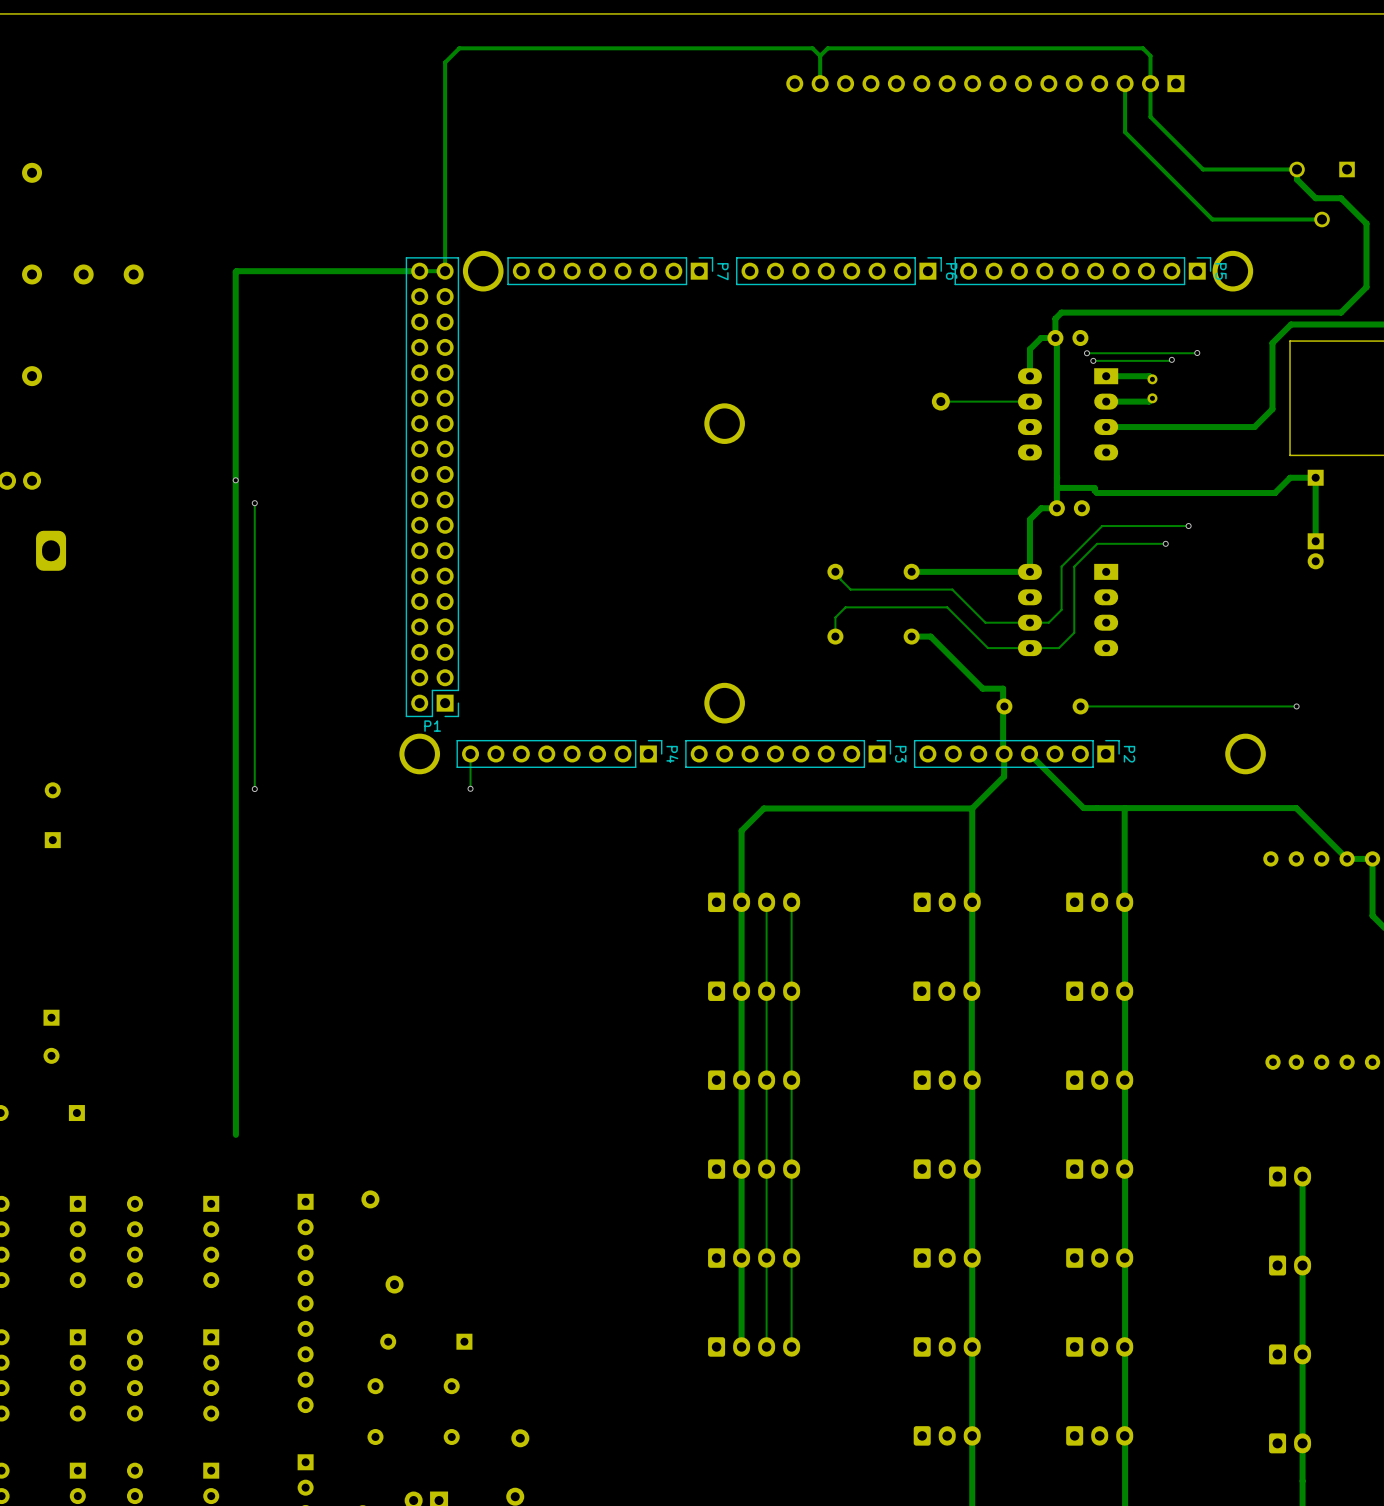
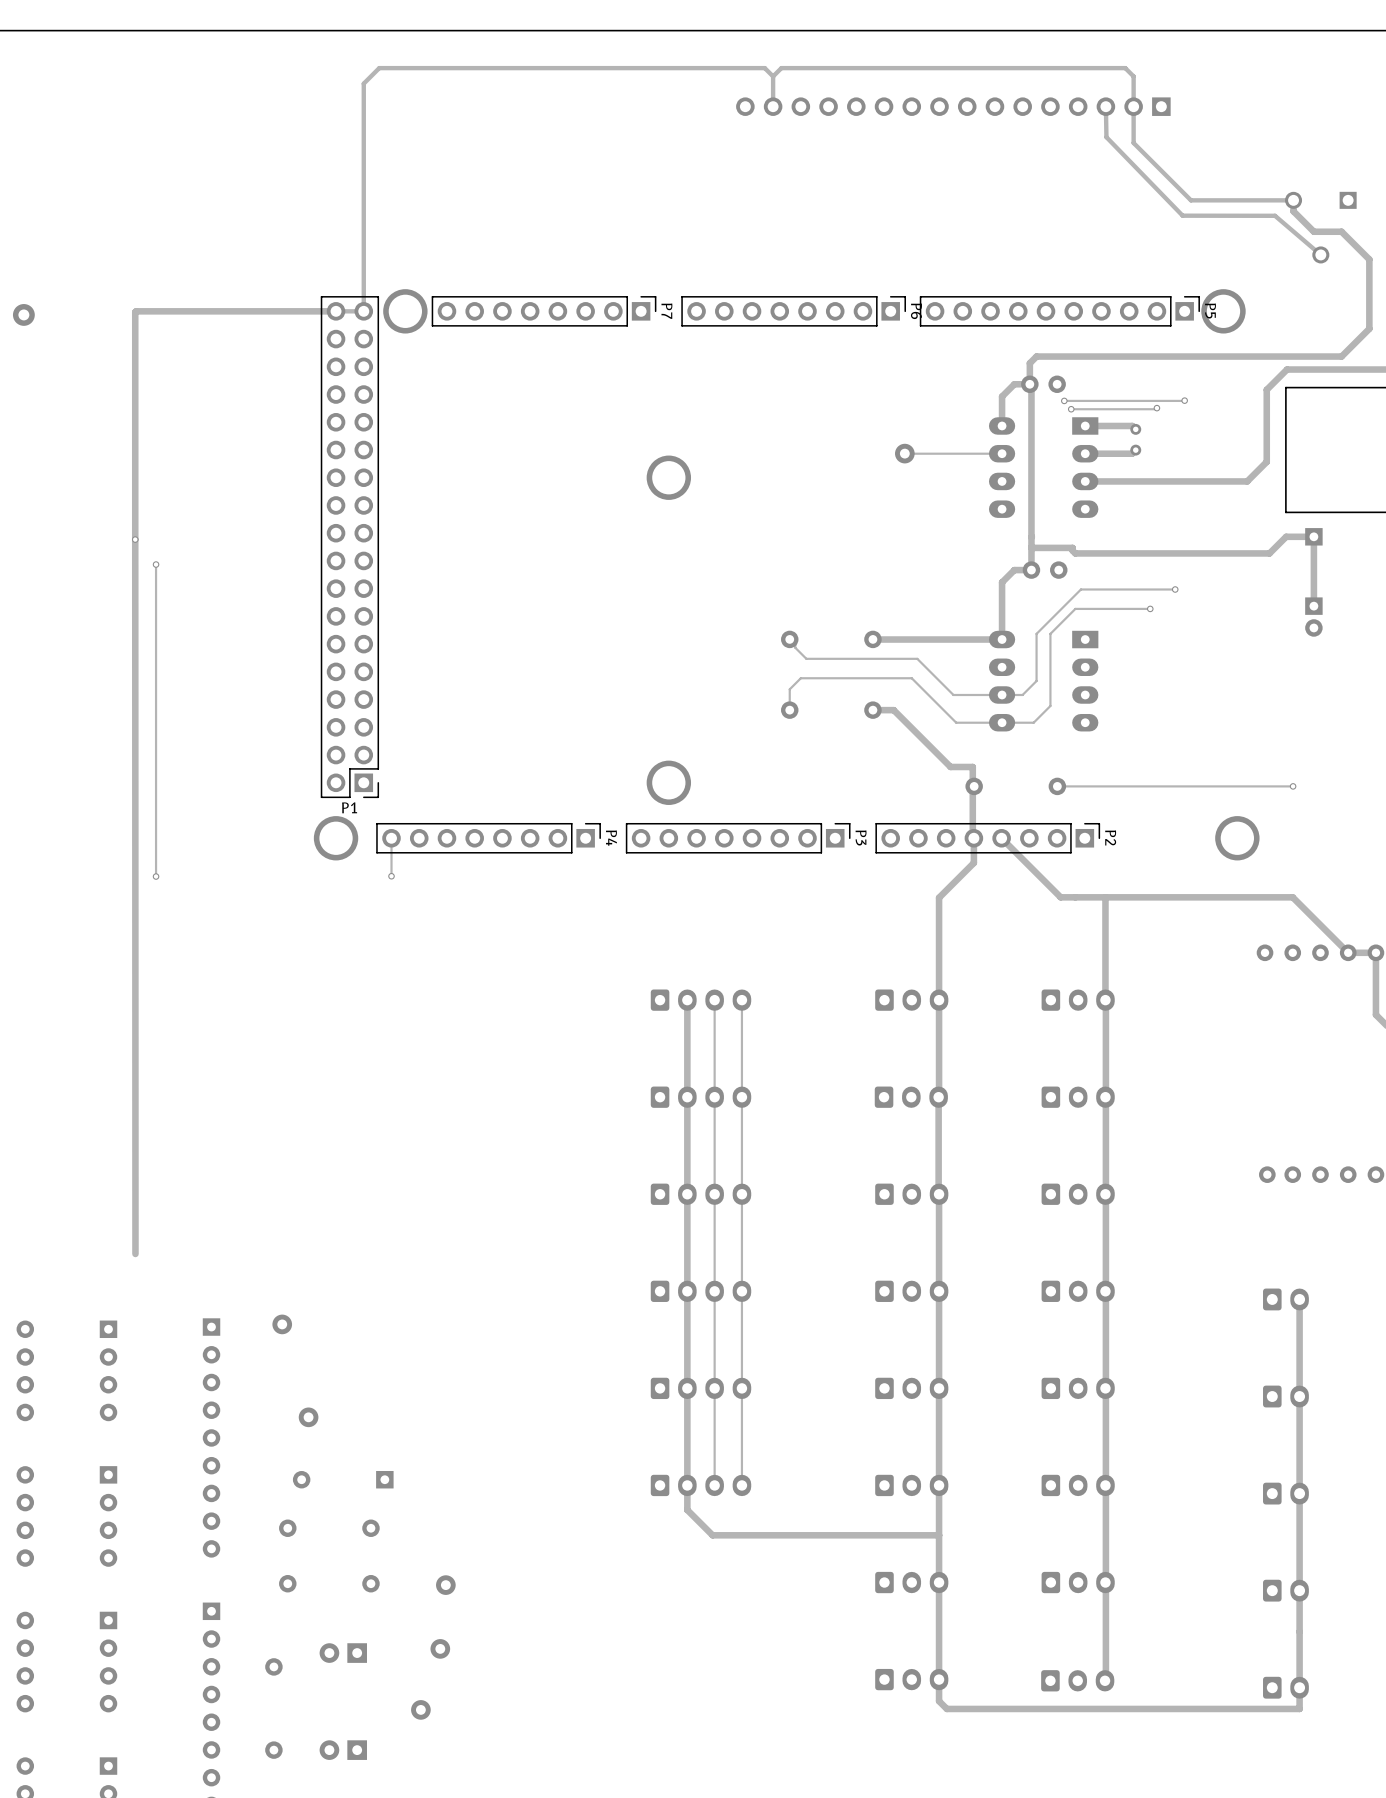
track: (1125, 83) (1125, 132) (1212, 219) (1322, 219) -> (1105, 106) (1106, 137) (1182, 215) (1275, 215) (1320, 254)
track: (972, 808) (763, 808) (741, 830) (741, 902) -> none
track: none -> (687, 1485) (687, 1509) (712, 1535) (939, 1535)

